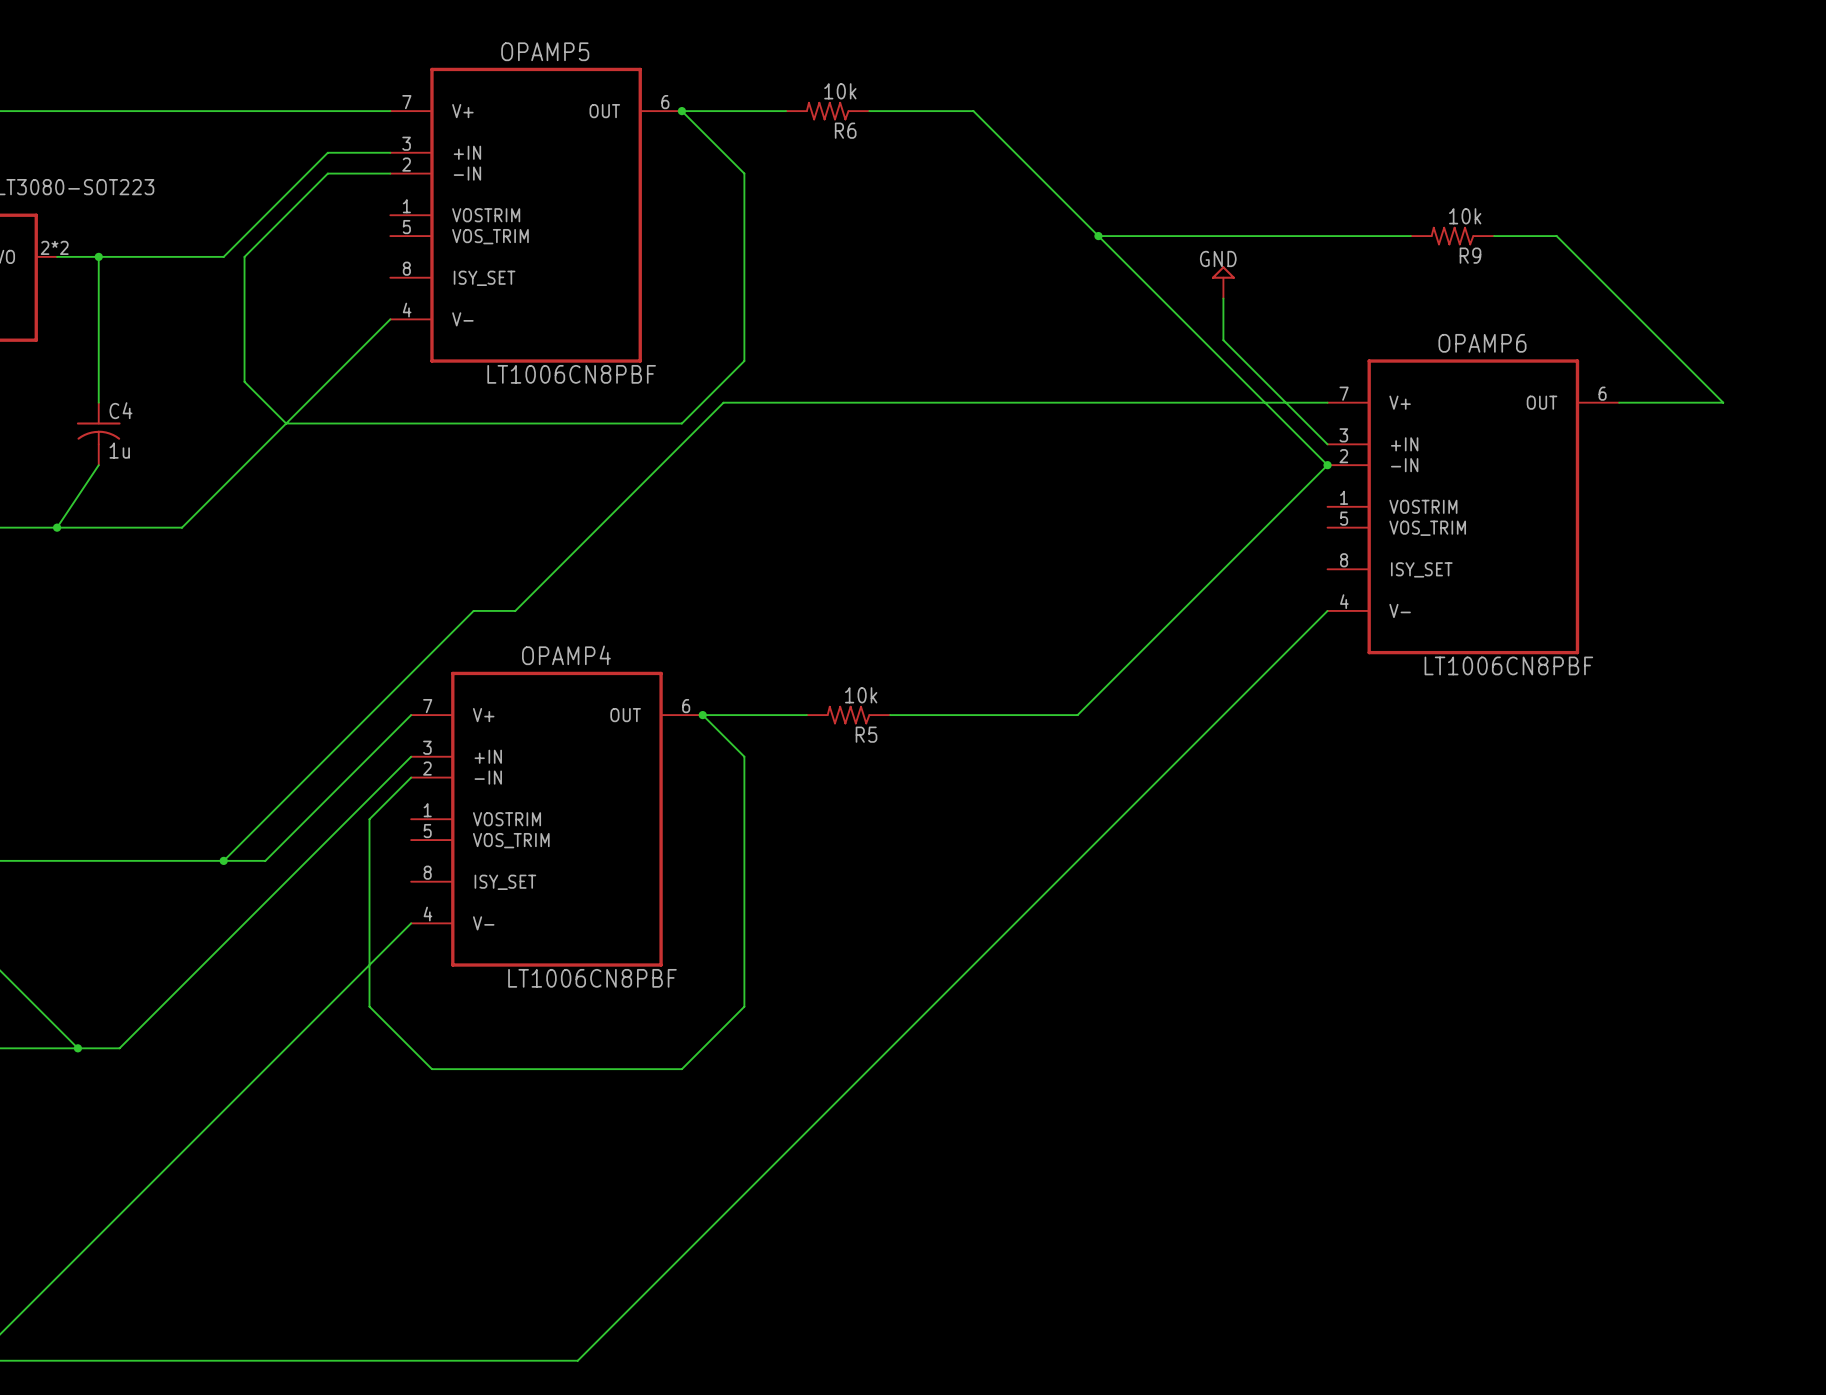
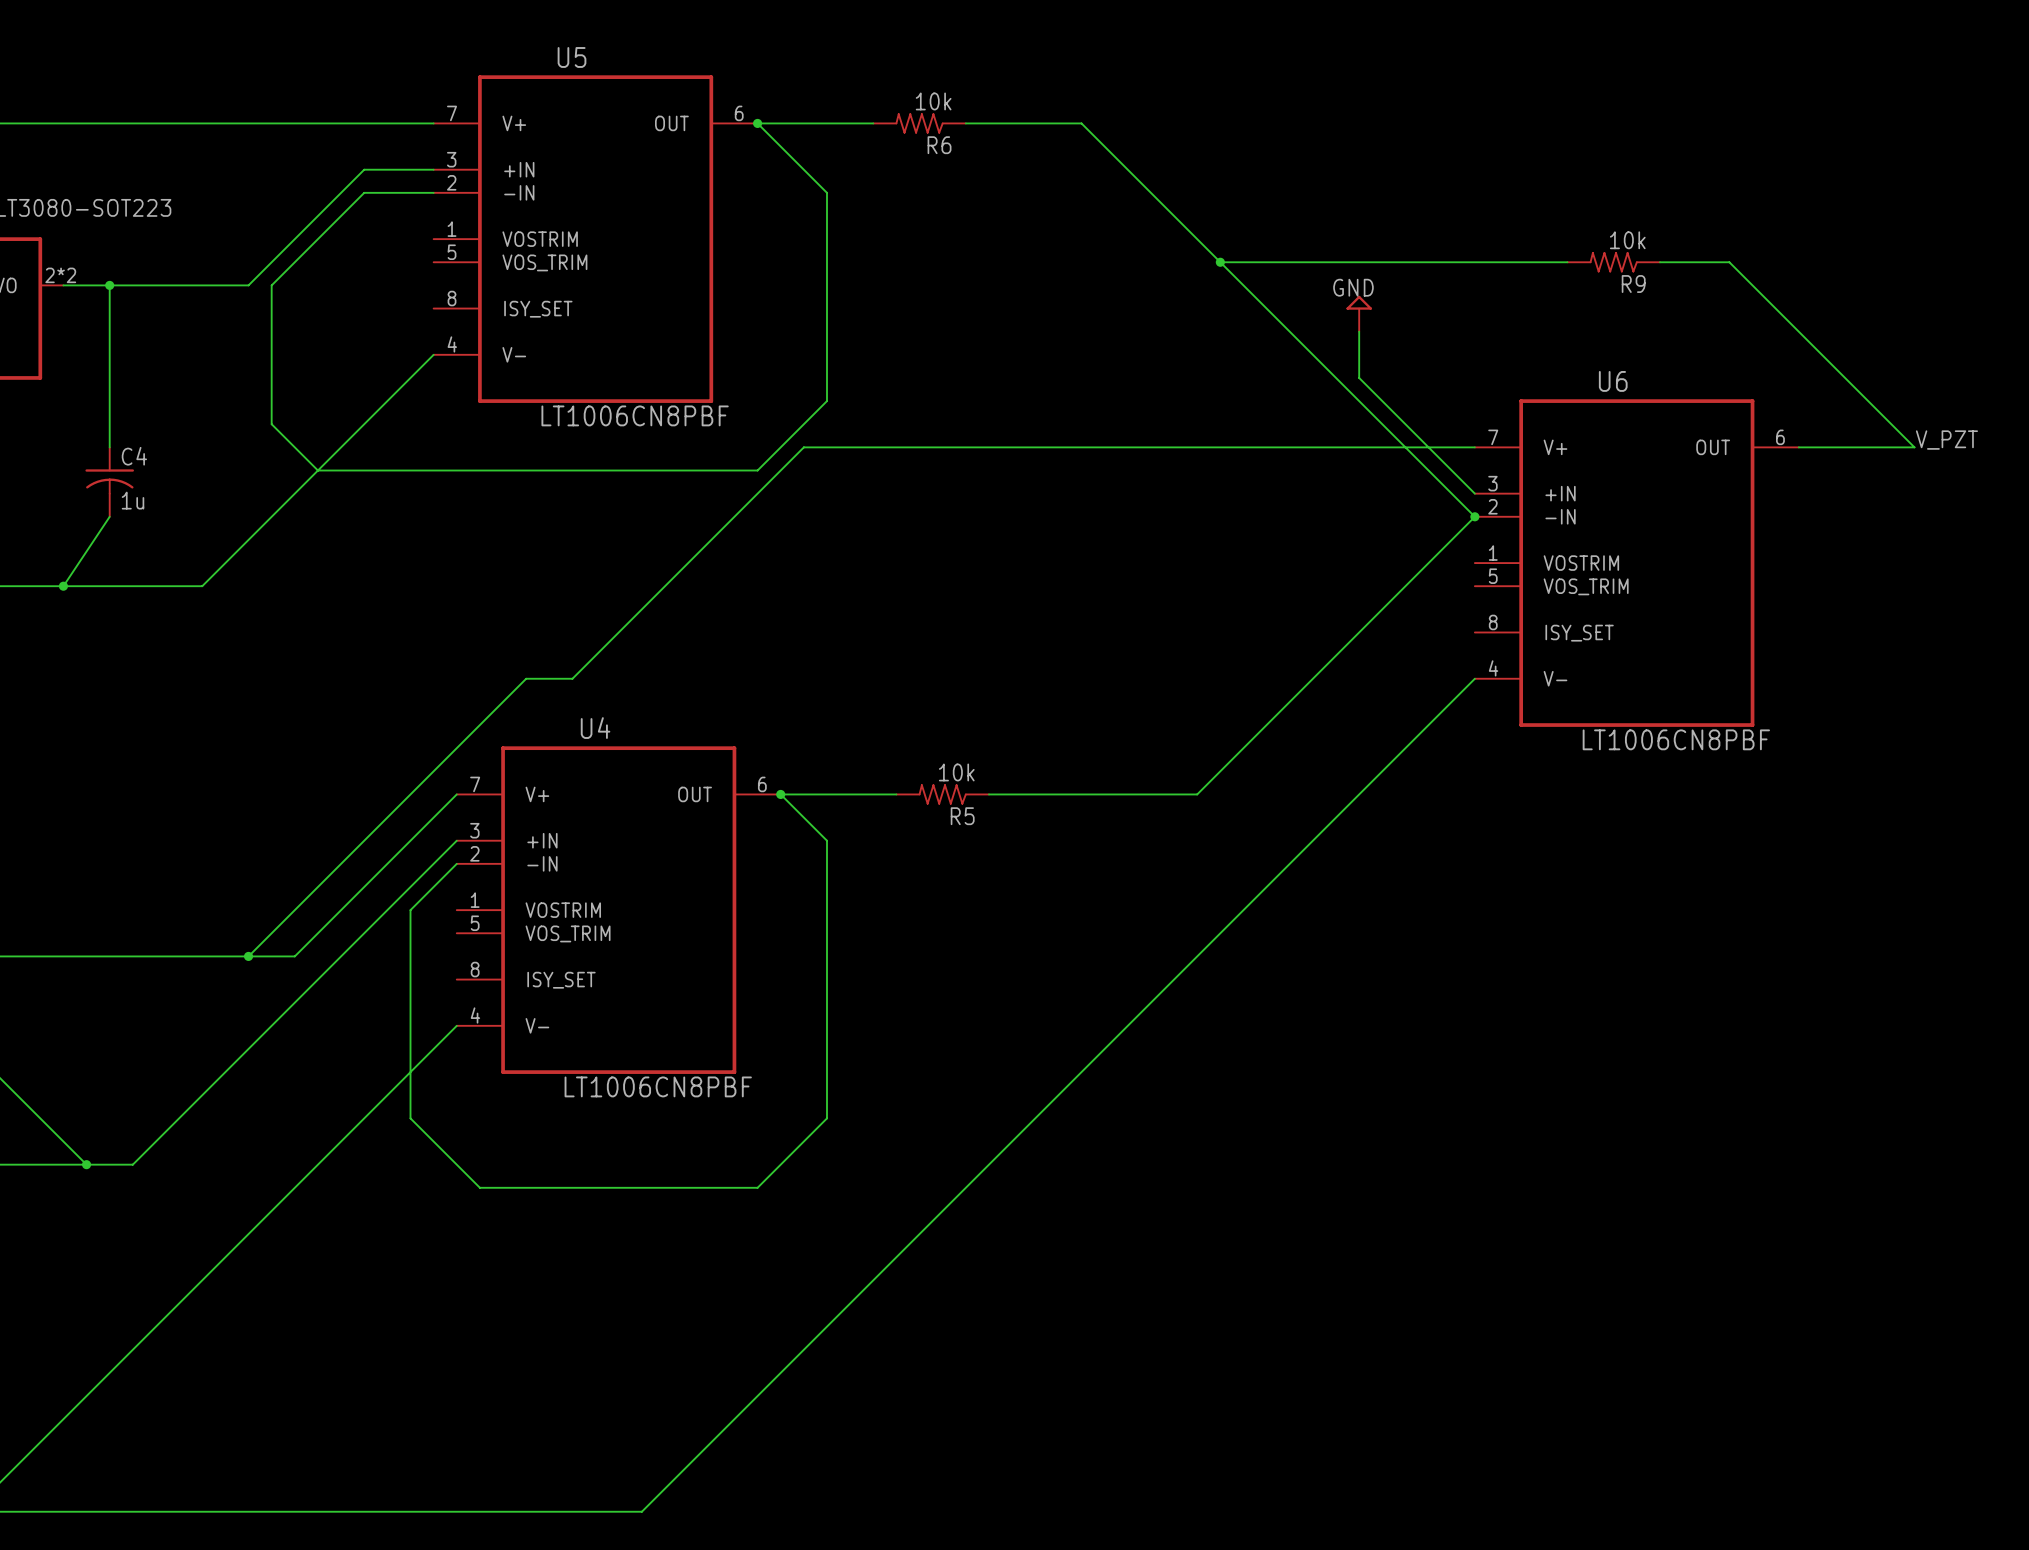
OPAMP5 name: OPAMP5 (545, 51) -> U5 (572, 57)
OPAMP6 name: OPAMP6 (1482, 343) -> U6 (1613, 381)
label: none -> V_PZT (1946, 440)
OPAMP4 name: OPAMP4 (566, 655) -> U4 (595, 728)

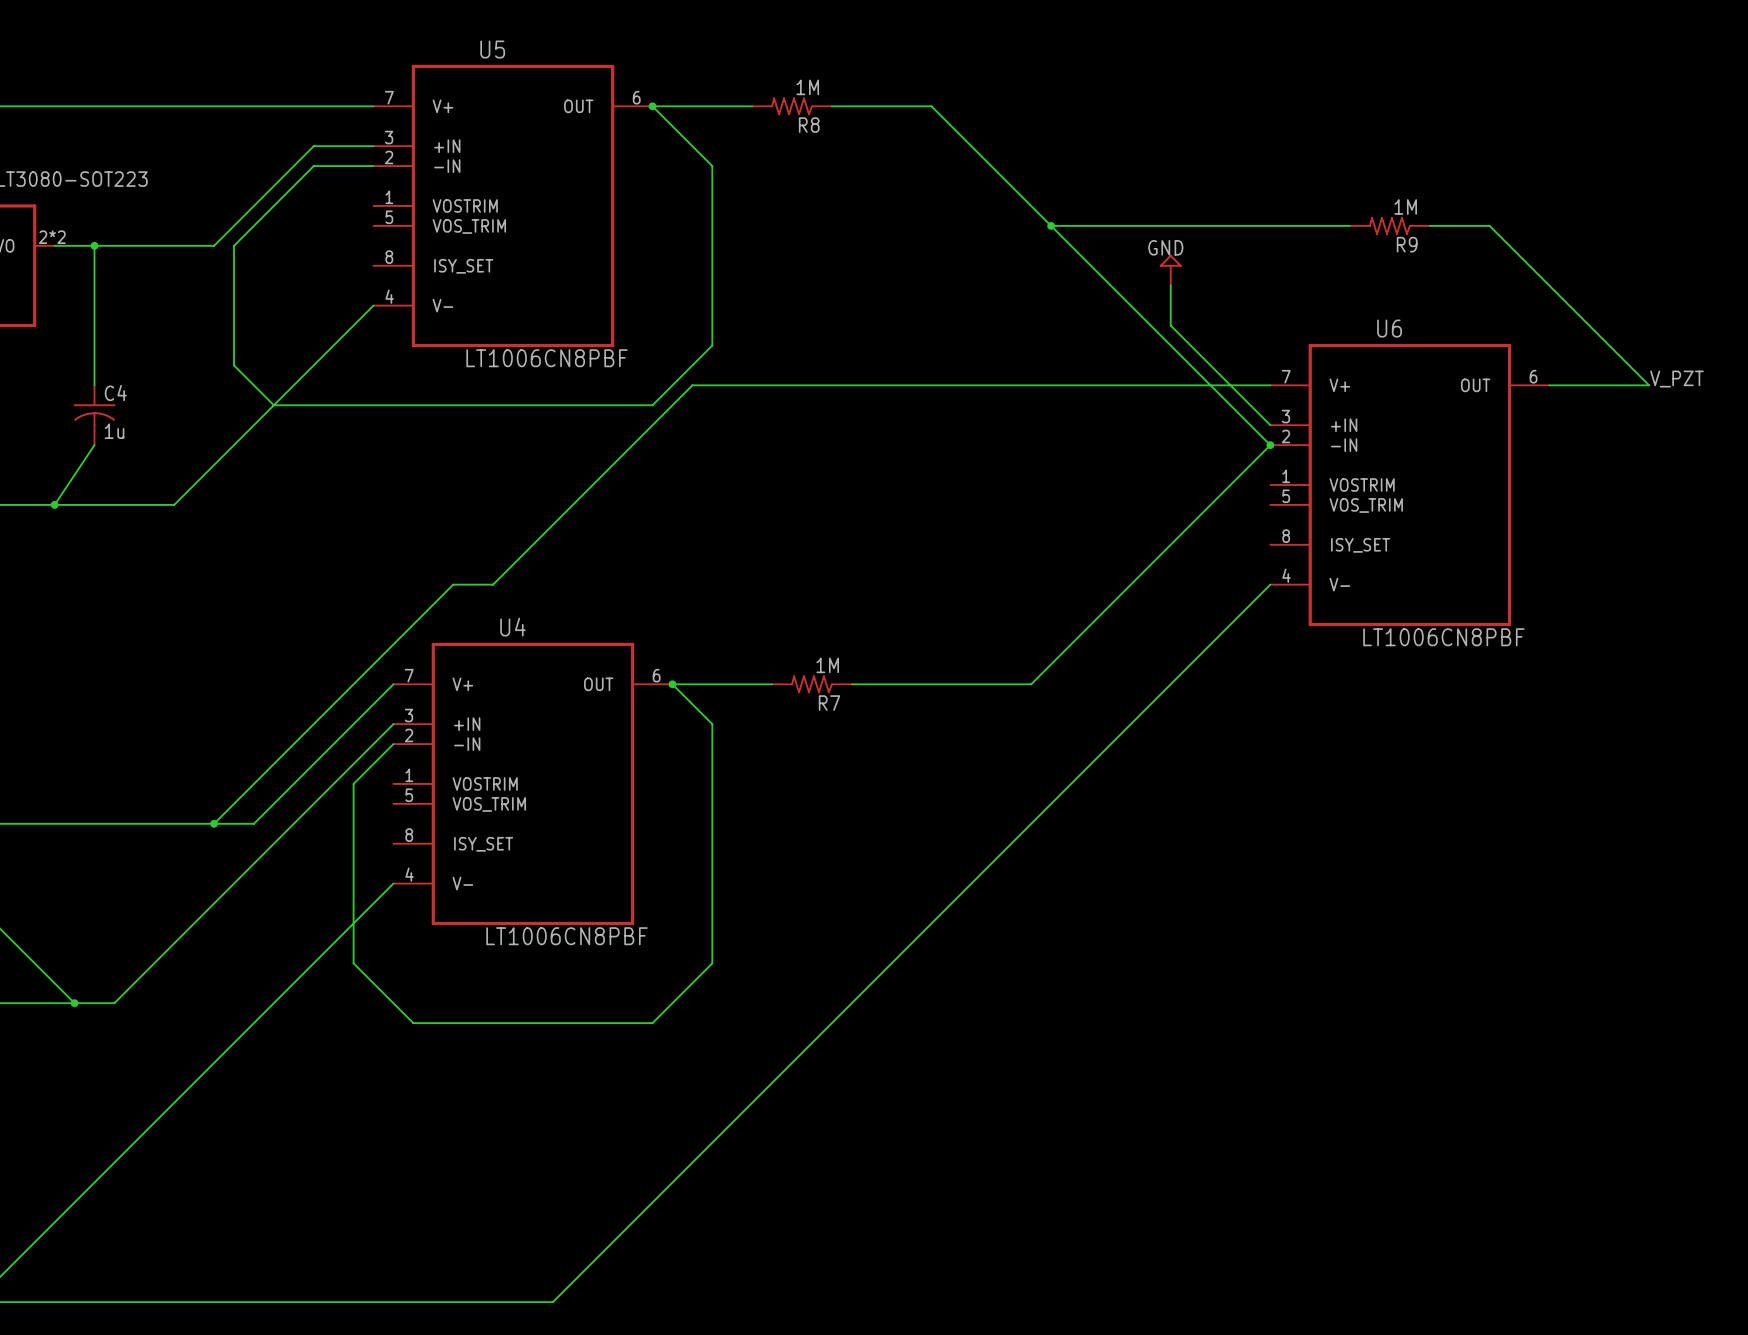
R6 value: 10k (933, 101) -> 1M (807, 87)
R6 name: R6 (939, 145) -> R8 (809, 125)
R9 value: 10k (1627, 240) -> 1M (1405, 206)
R5 value: 10k (956, 772) -> 1M (827, 665)
R5 name: R5 (962, 816) -> R7 (829, 703)

